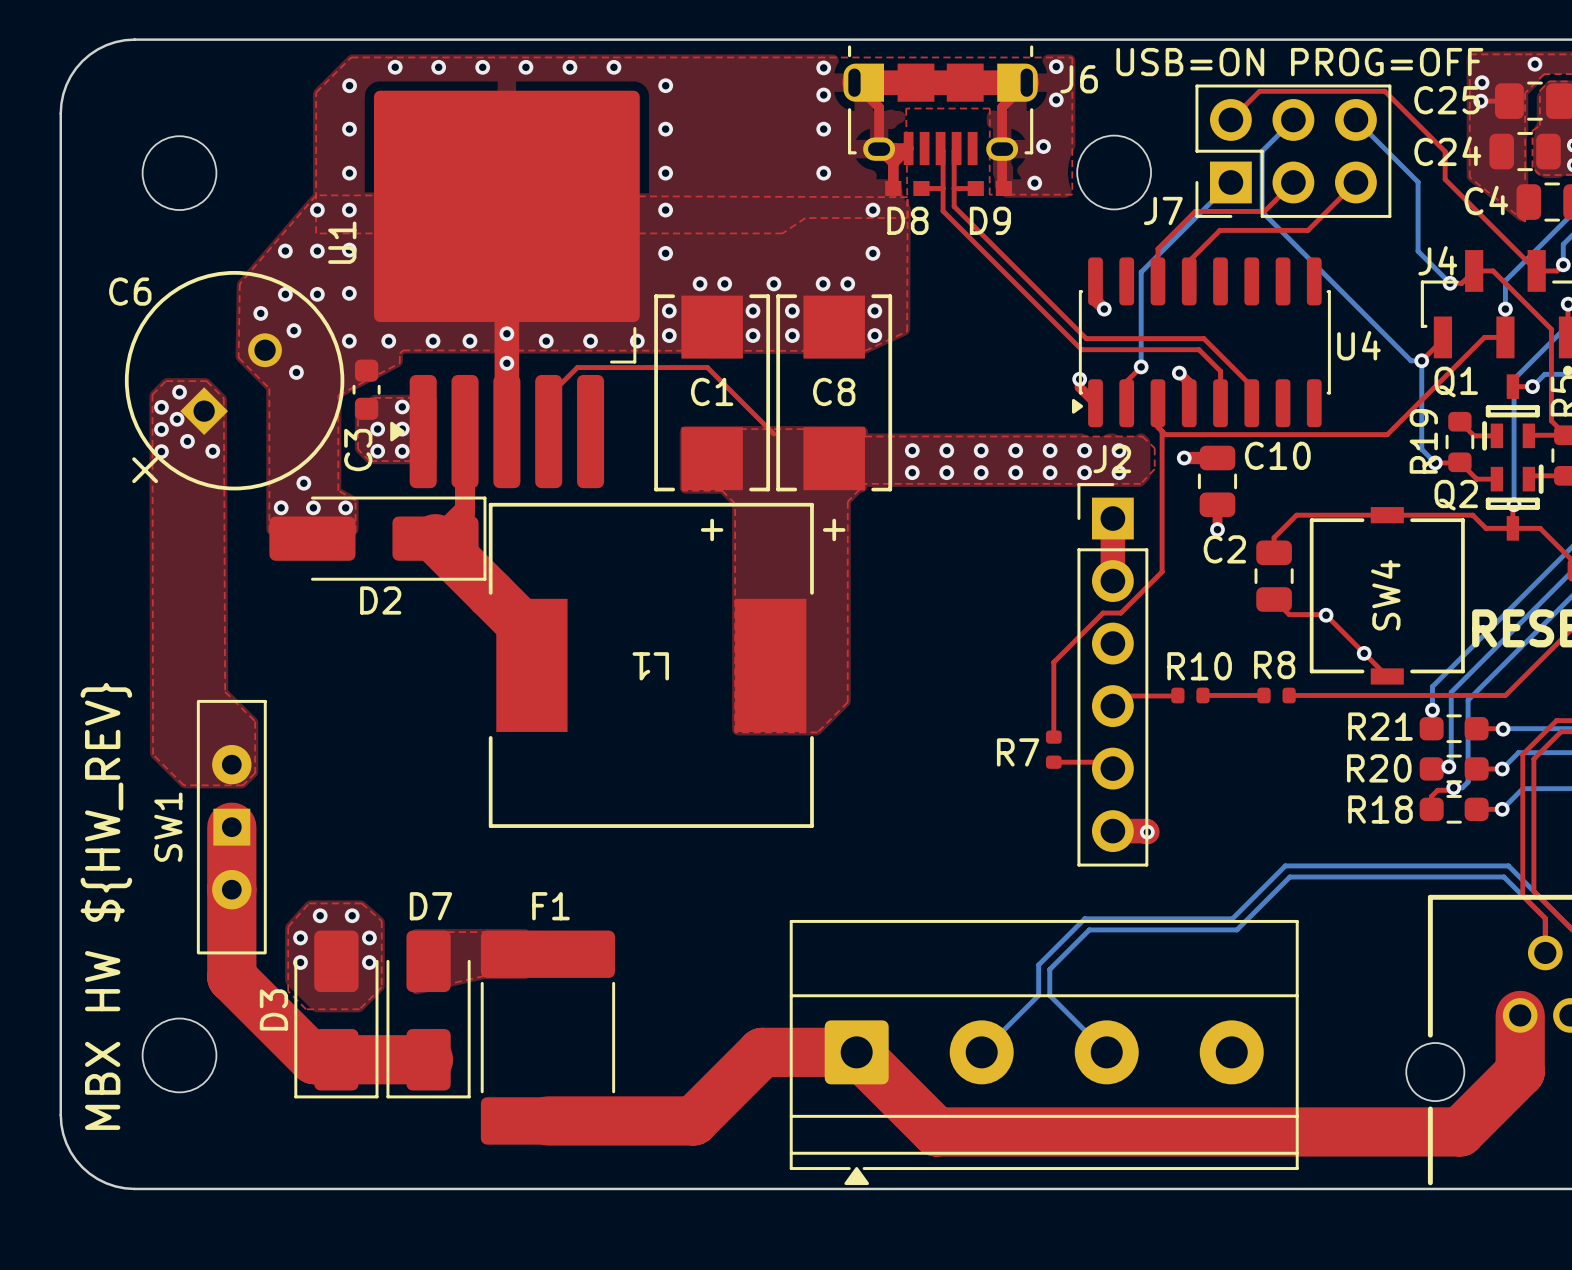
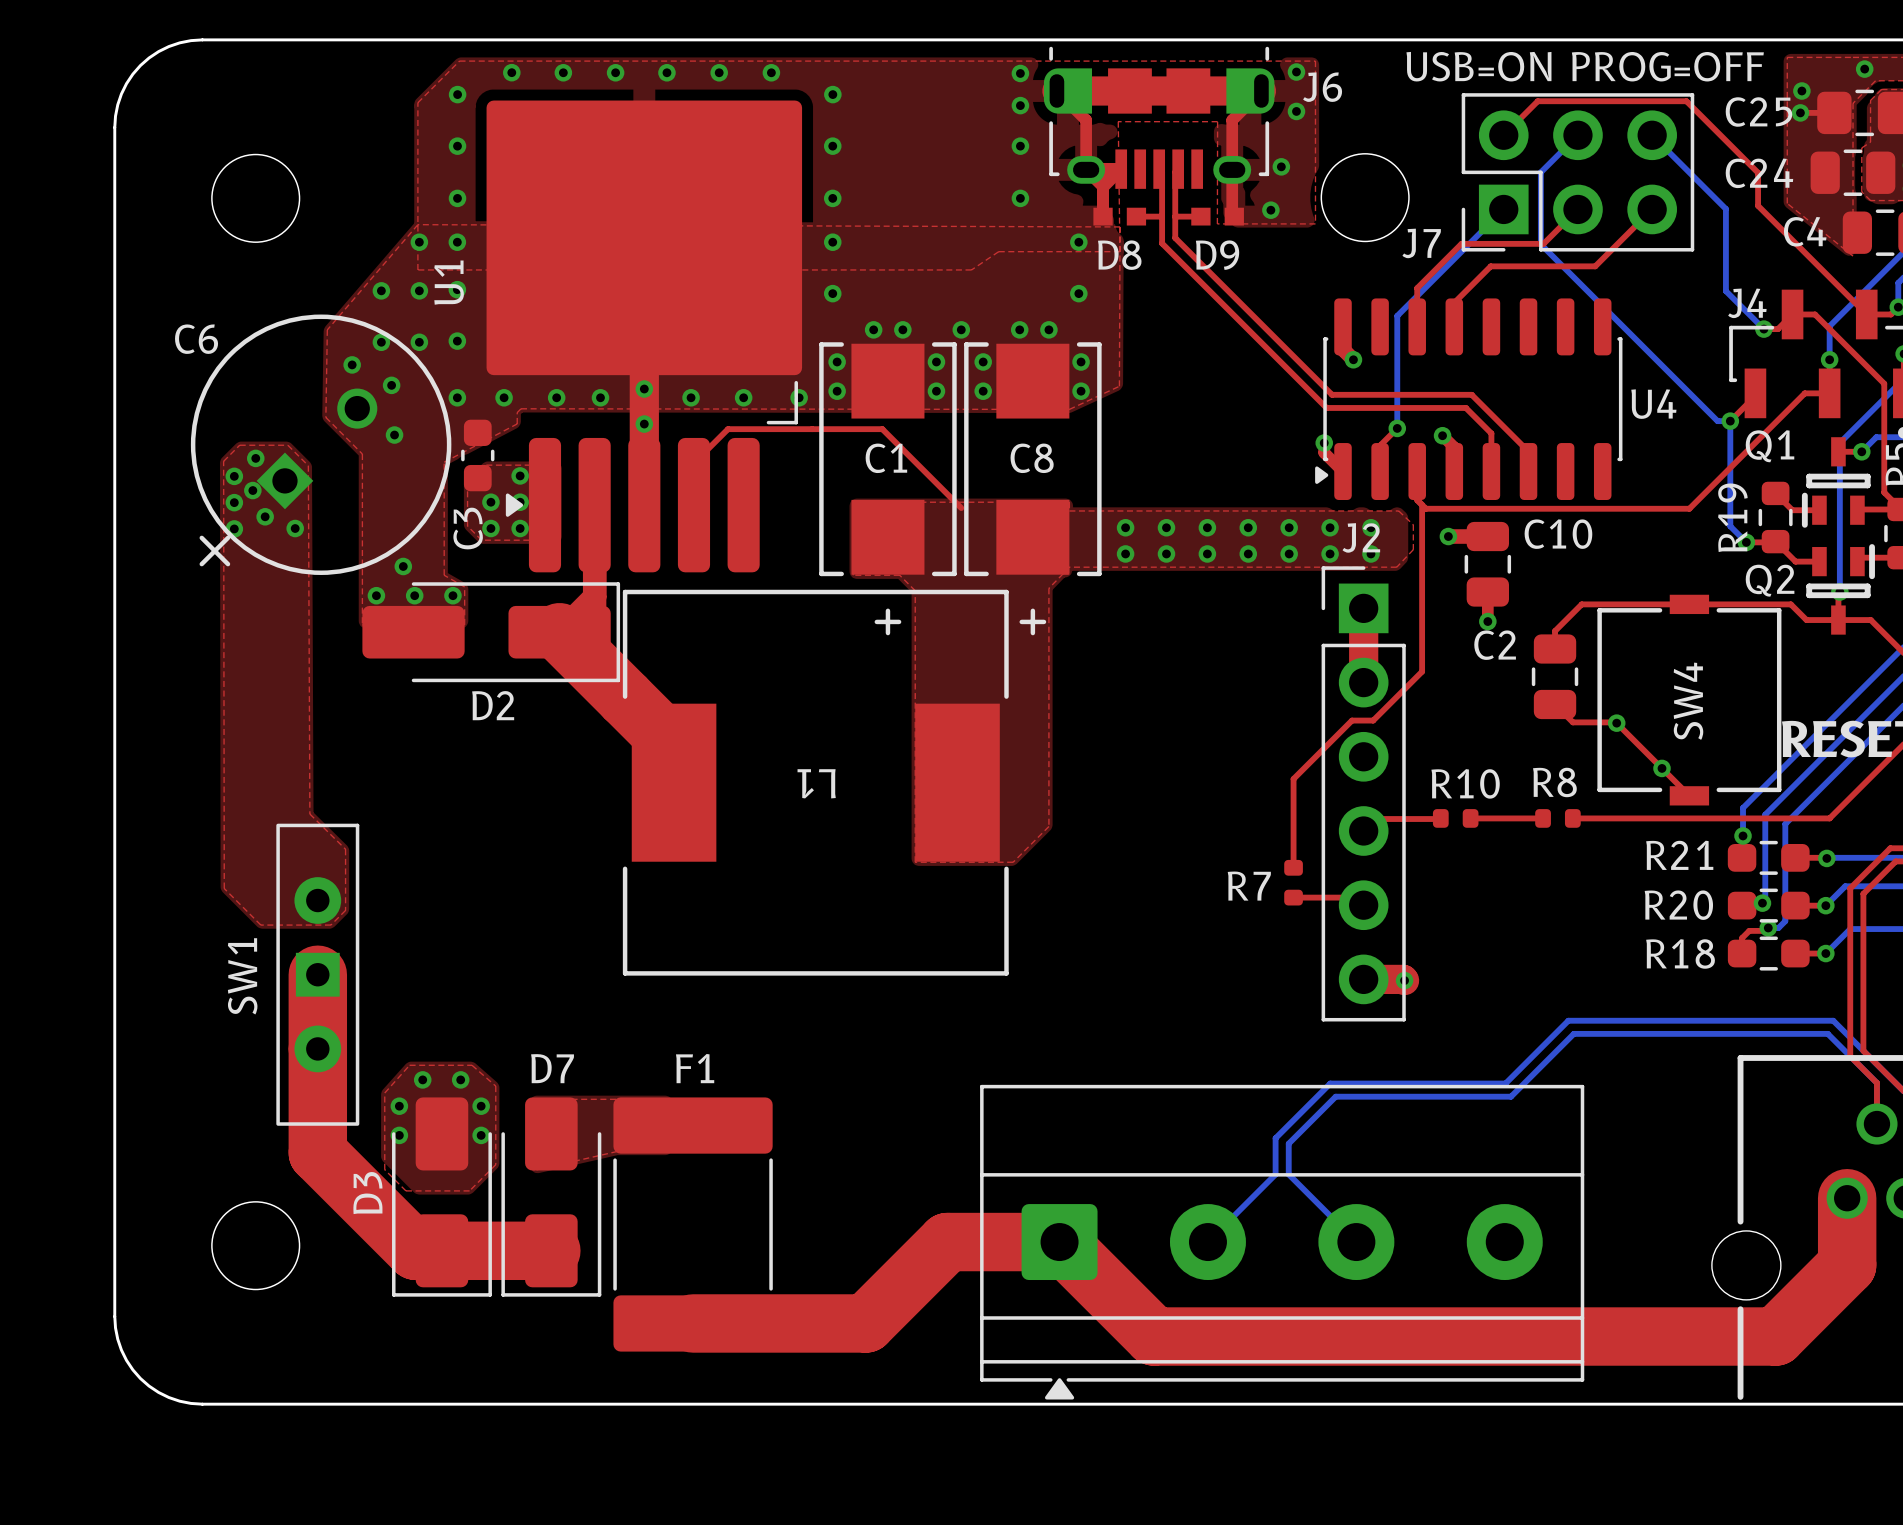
text: MBX HW ${HW_REV} (106, 906) -> none

